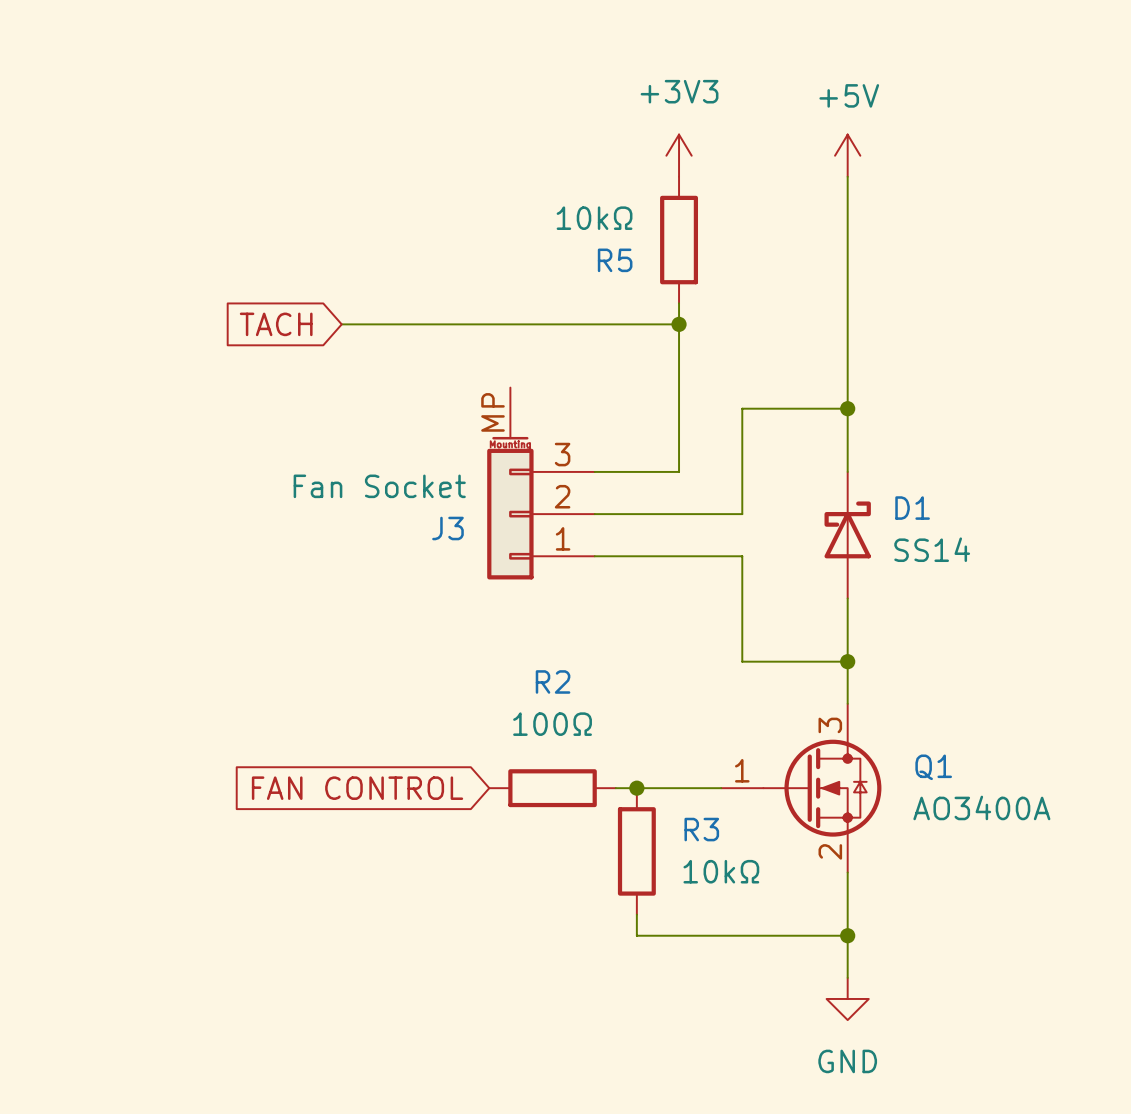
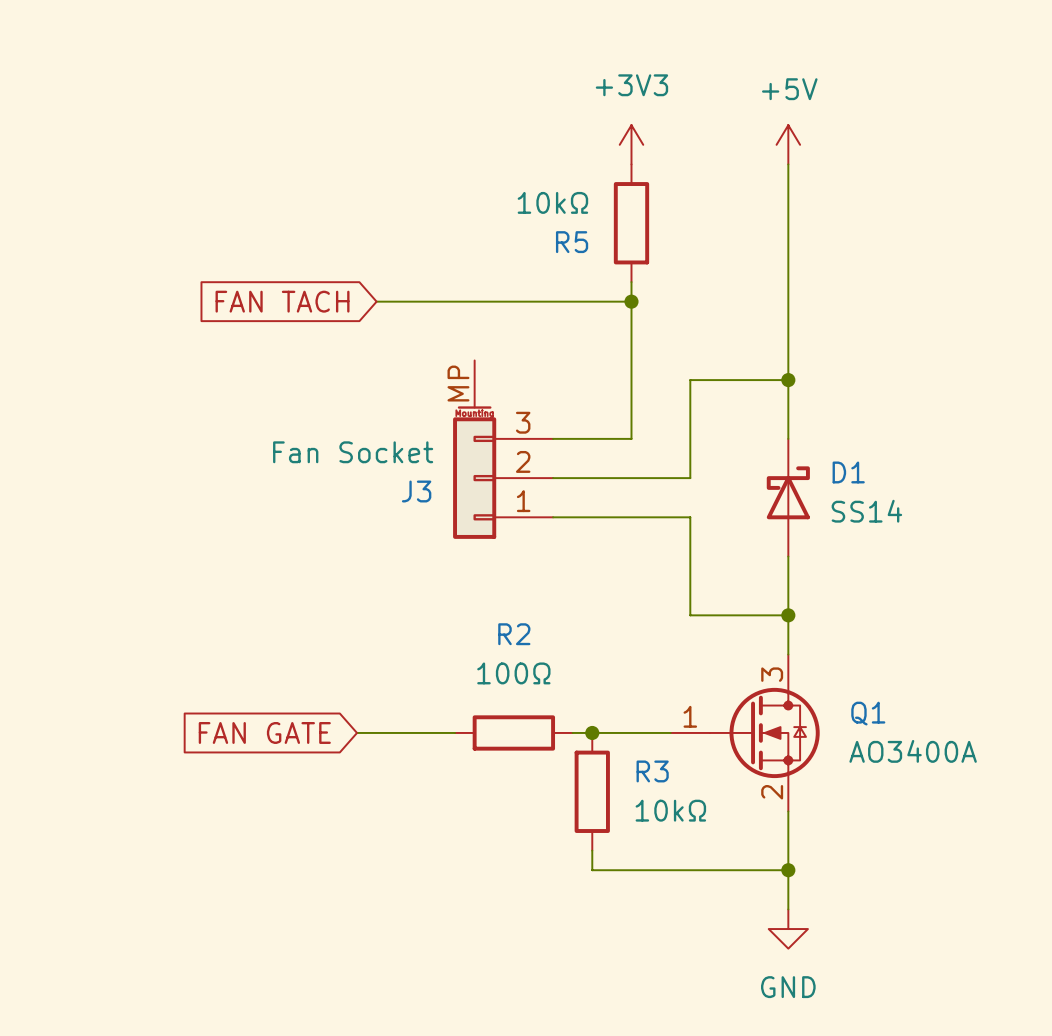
global label: TACH (276, 324) -> FAN TACH (282, 301)
wire: (341, 324) (404, 324) -> none
global label: none -> FAN GATE (264, 732)
global label: FAN CONTROL (357, 788) -> none
wire: none -> (357, 732) (455, 732)

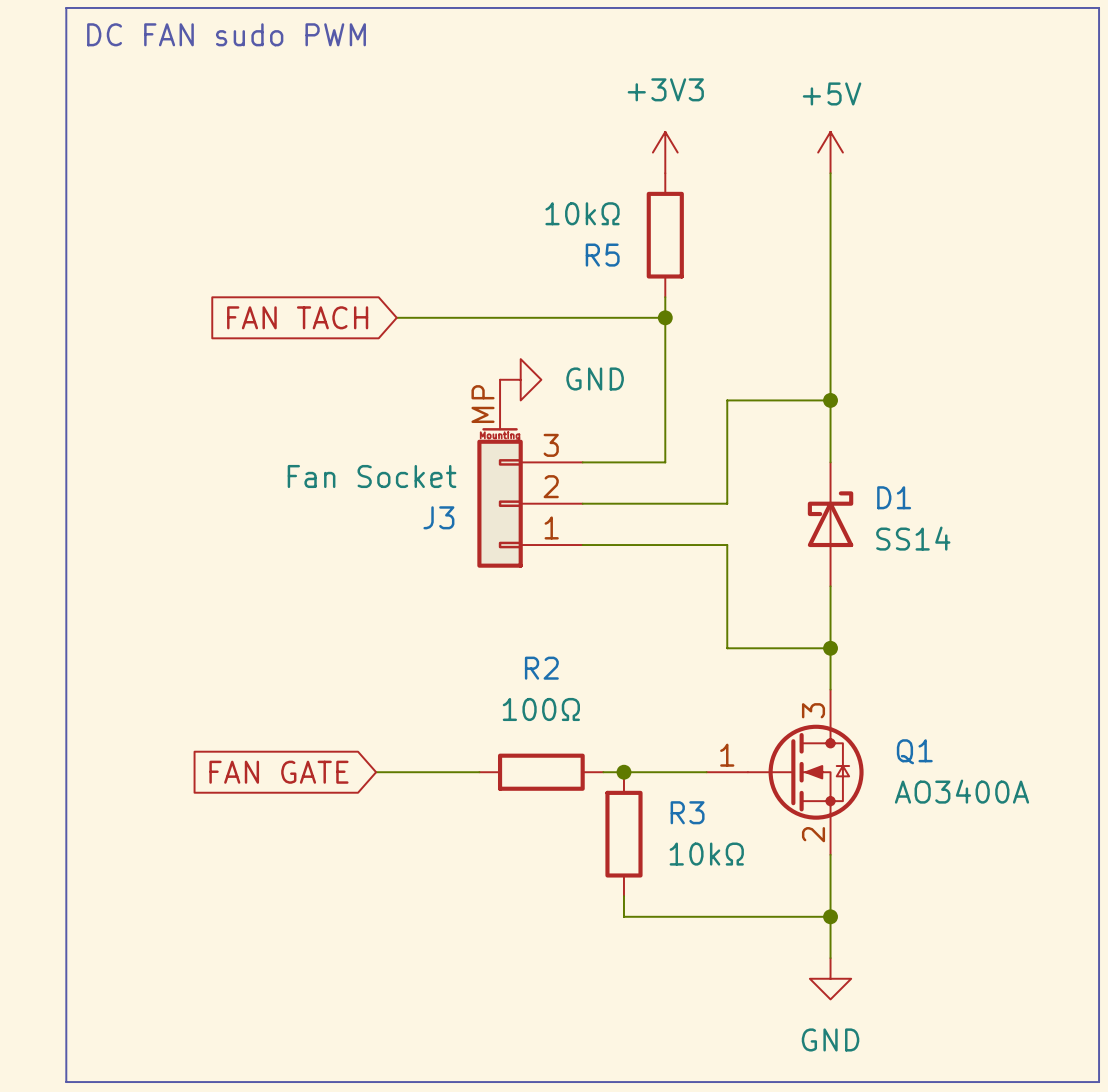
line: none -> (66, 7) (1099, 7) (1099, 1082) (66, 1082) (66, 7)
text: none -> DC FAN sudo PWM (226, 34)
power symbol: none -> GND (520, 379)

